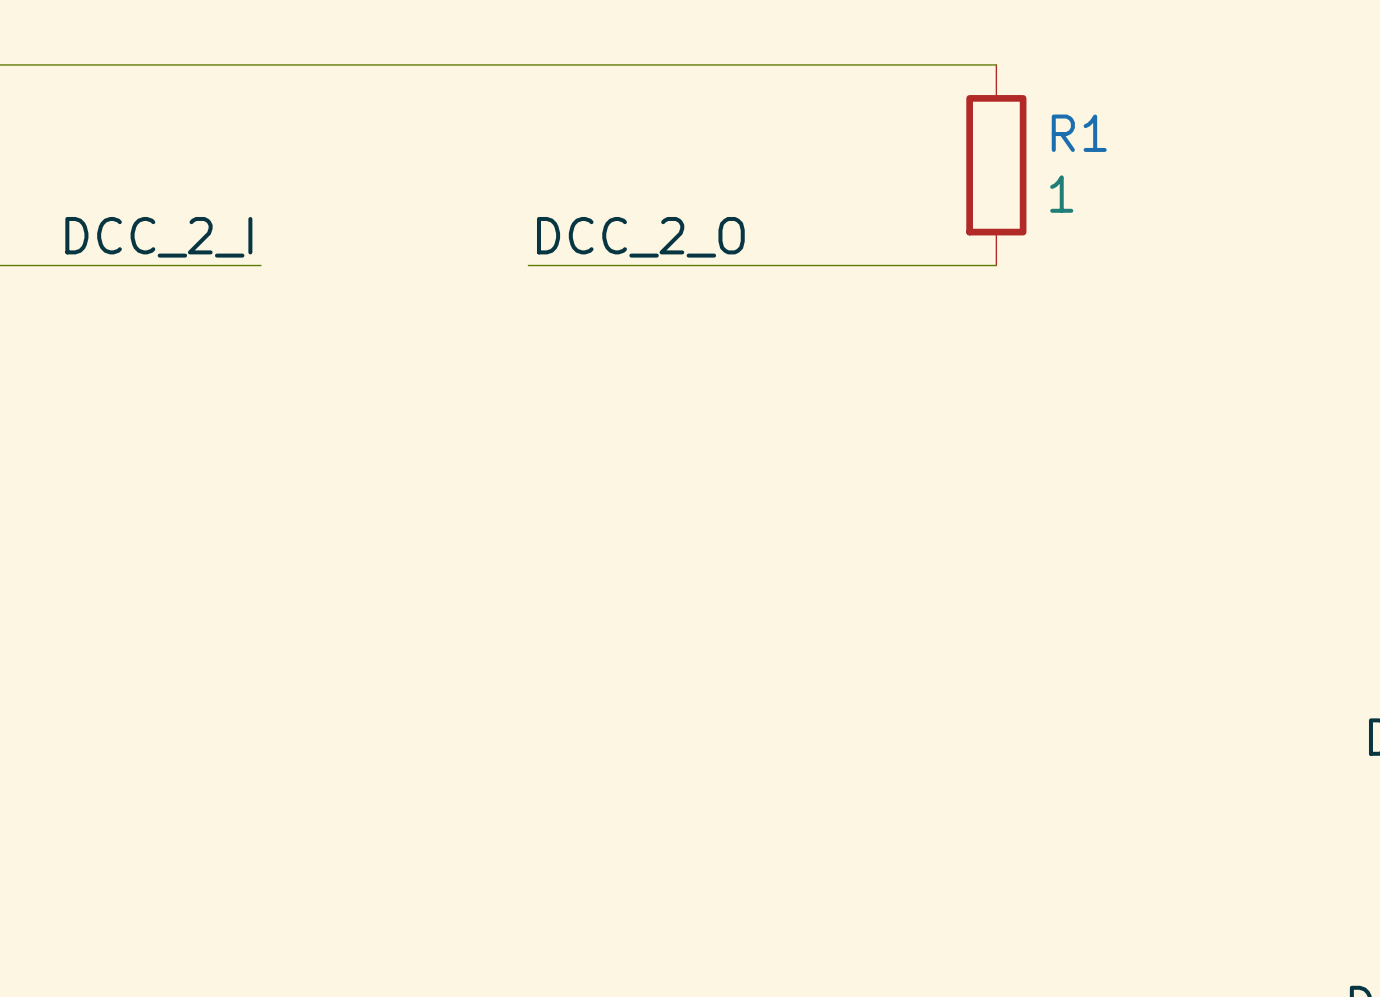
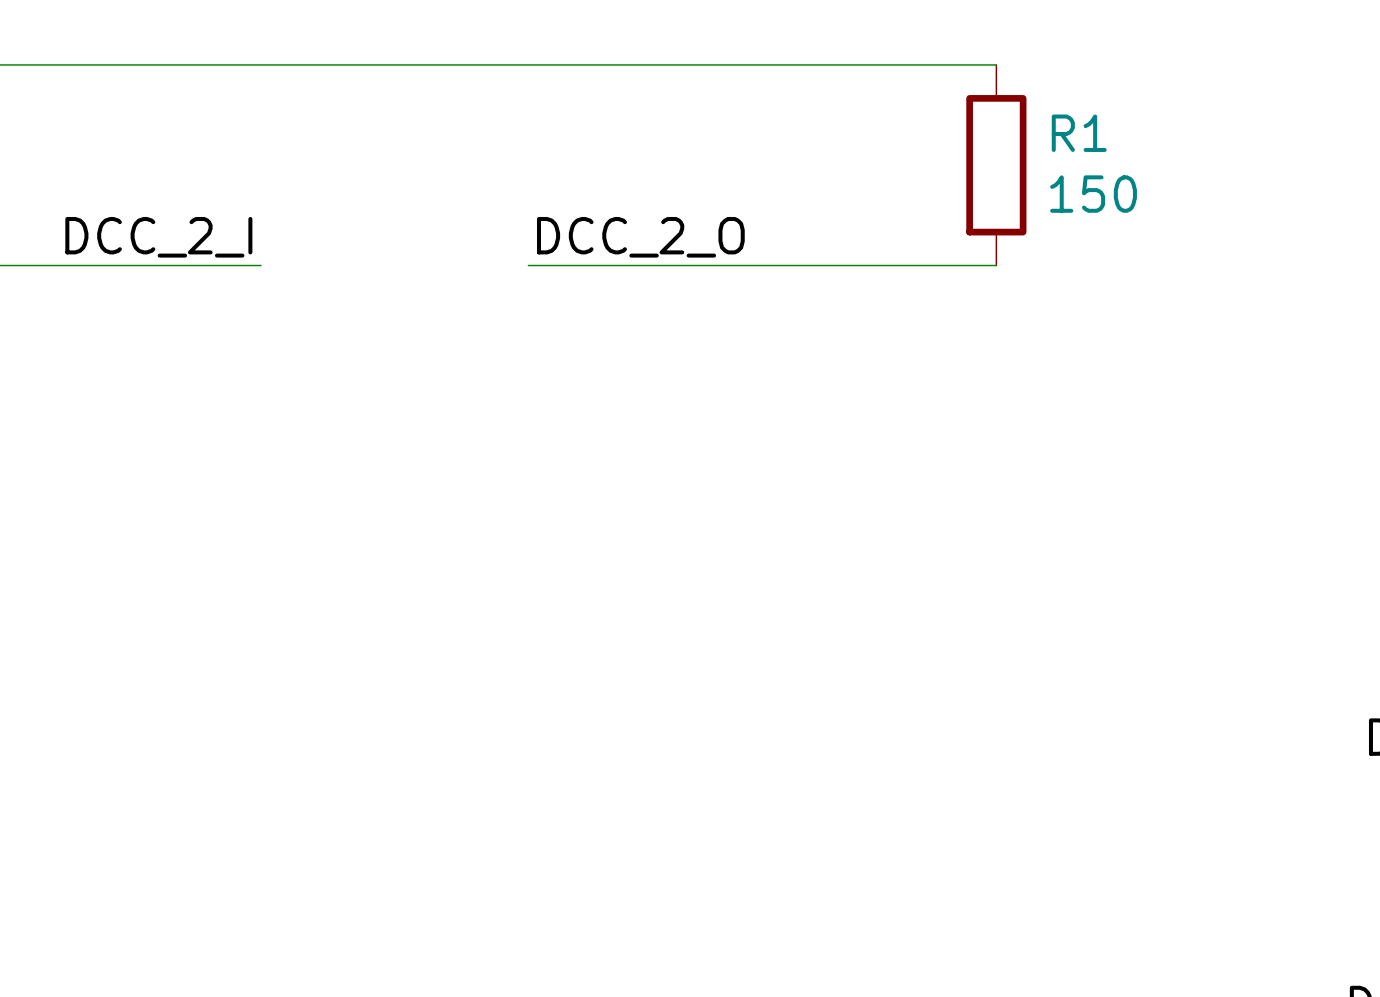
R1 value: 1 (1061, 194) -> 150 (1093, 194)

